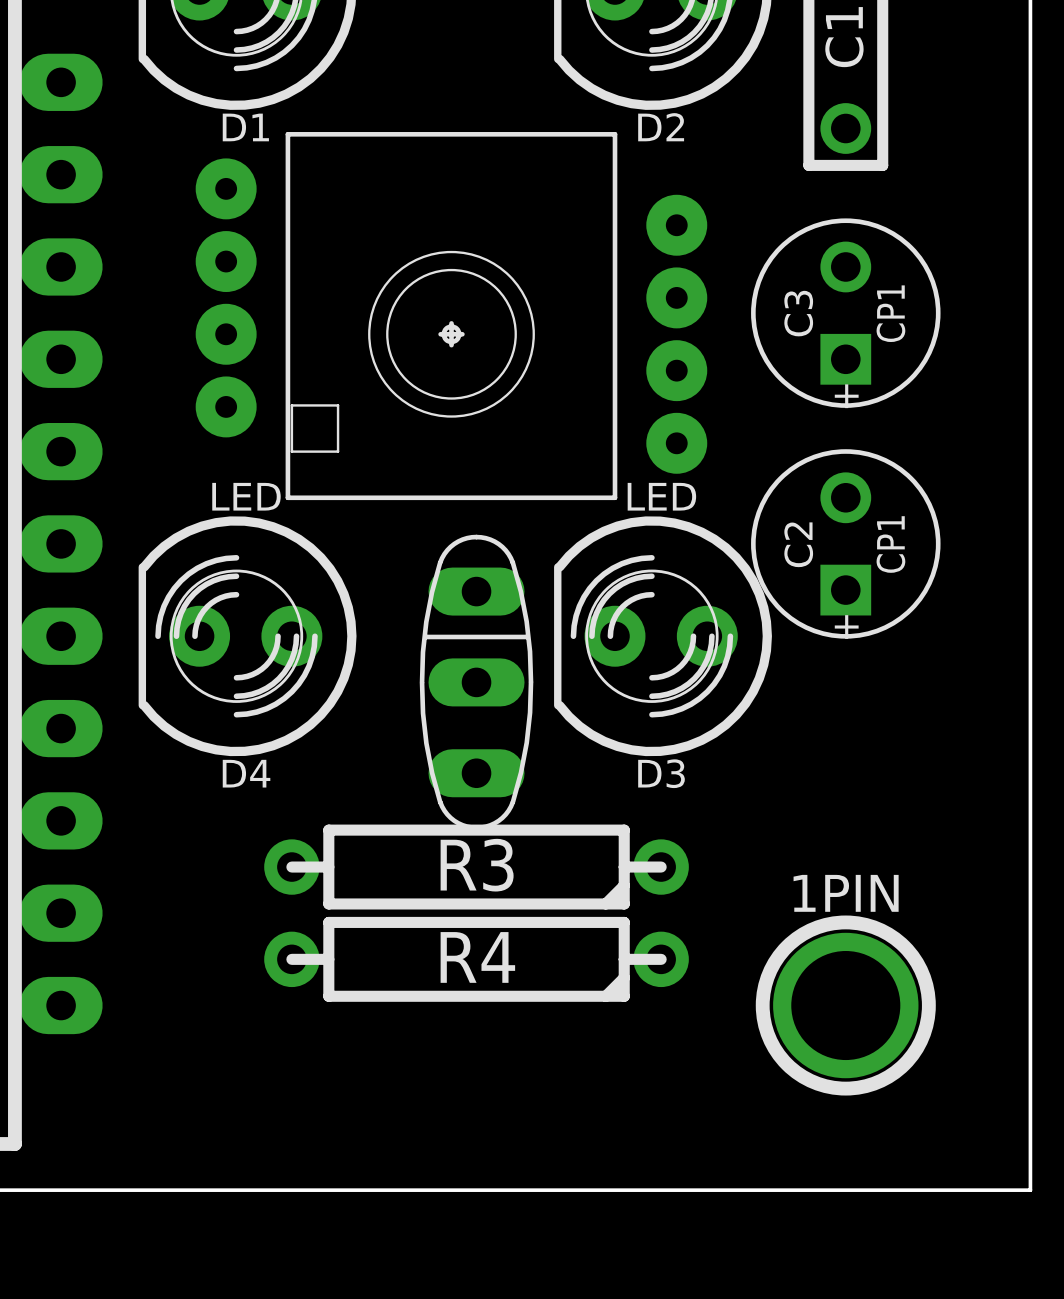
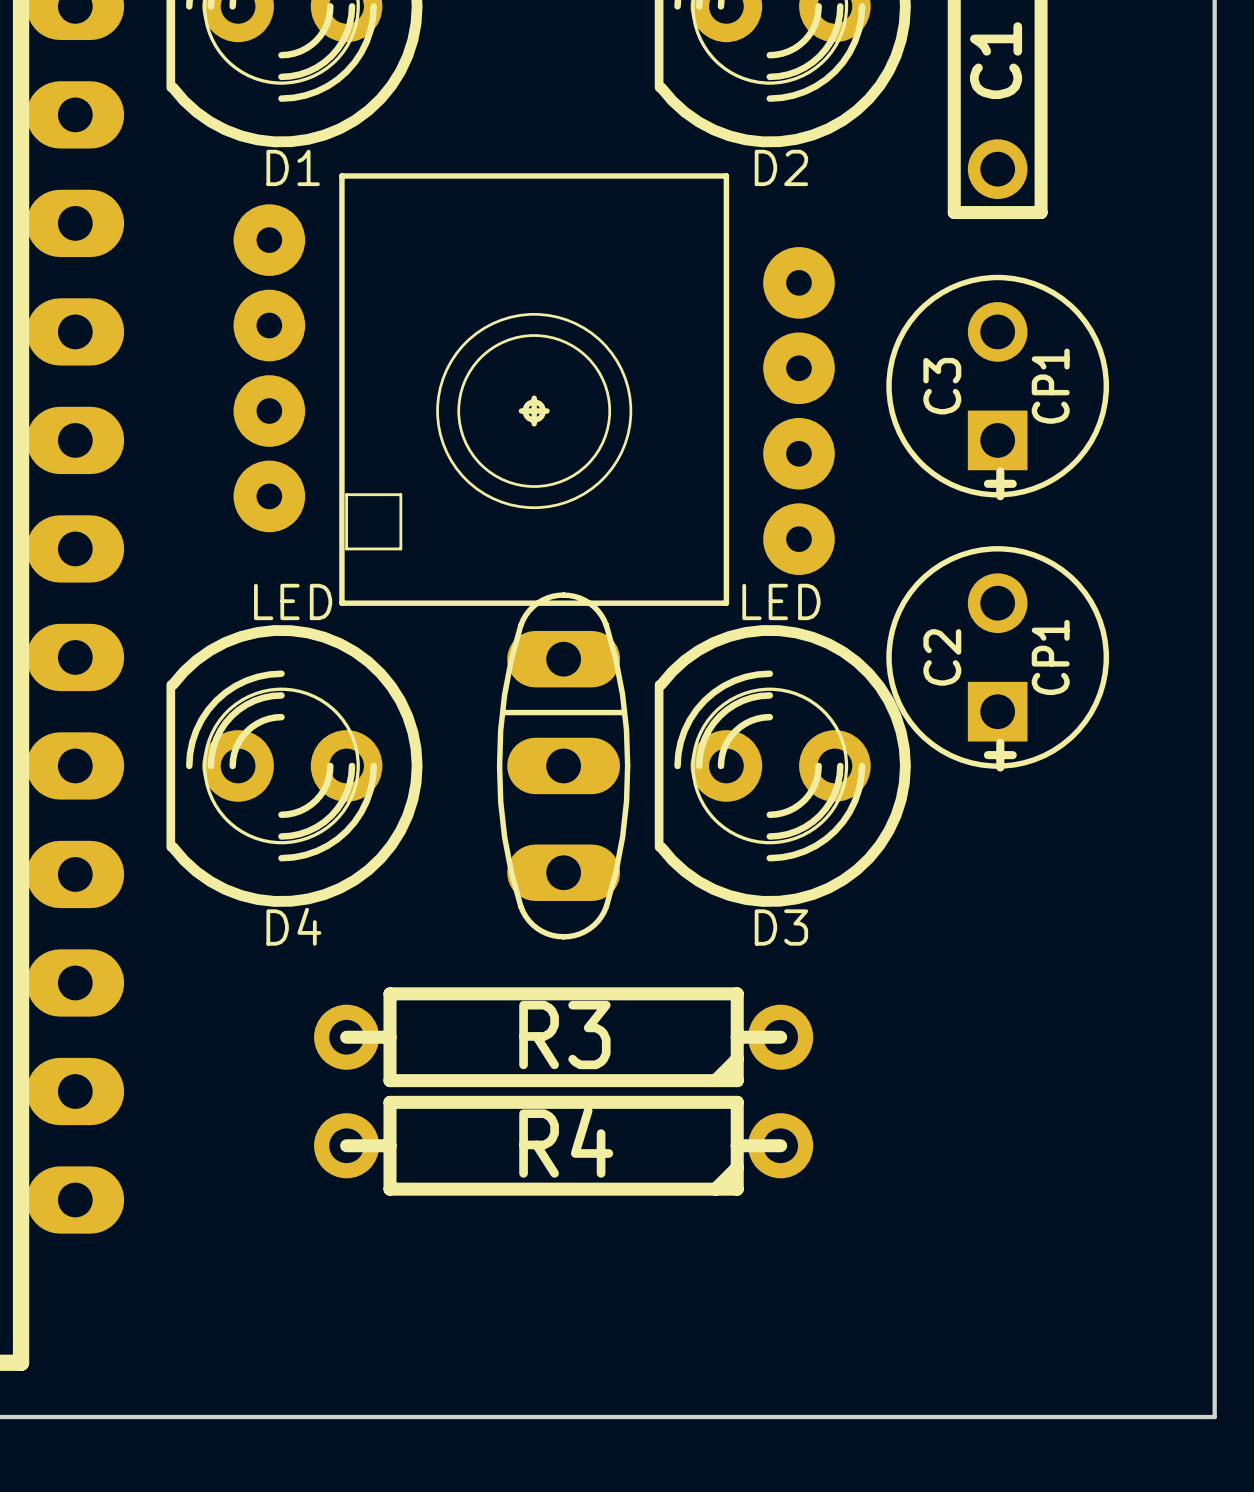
part position: (476, 682) -> (563, 765)
1PIN: (845, 1005) -> none

